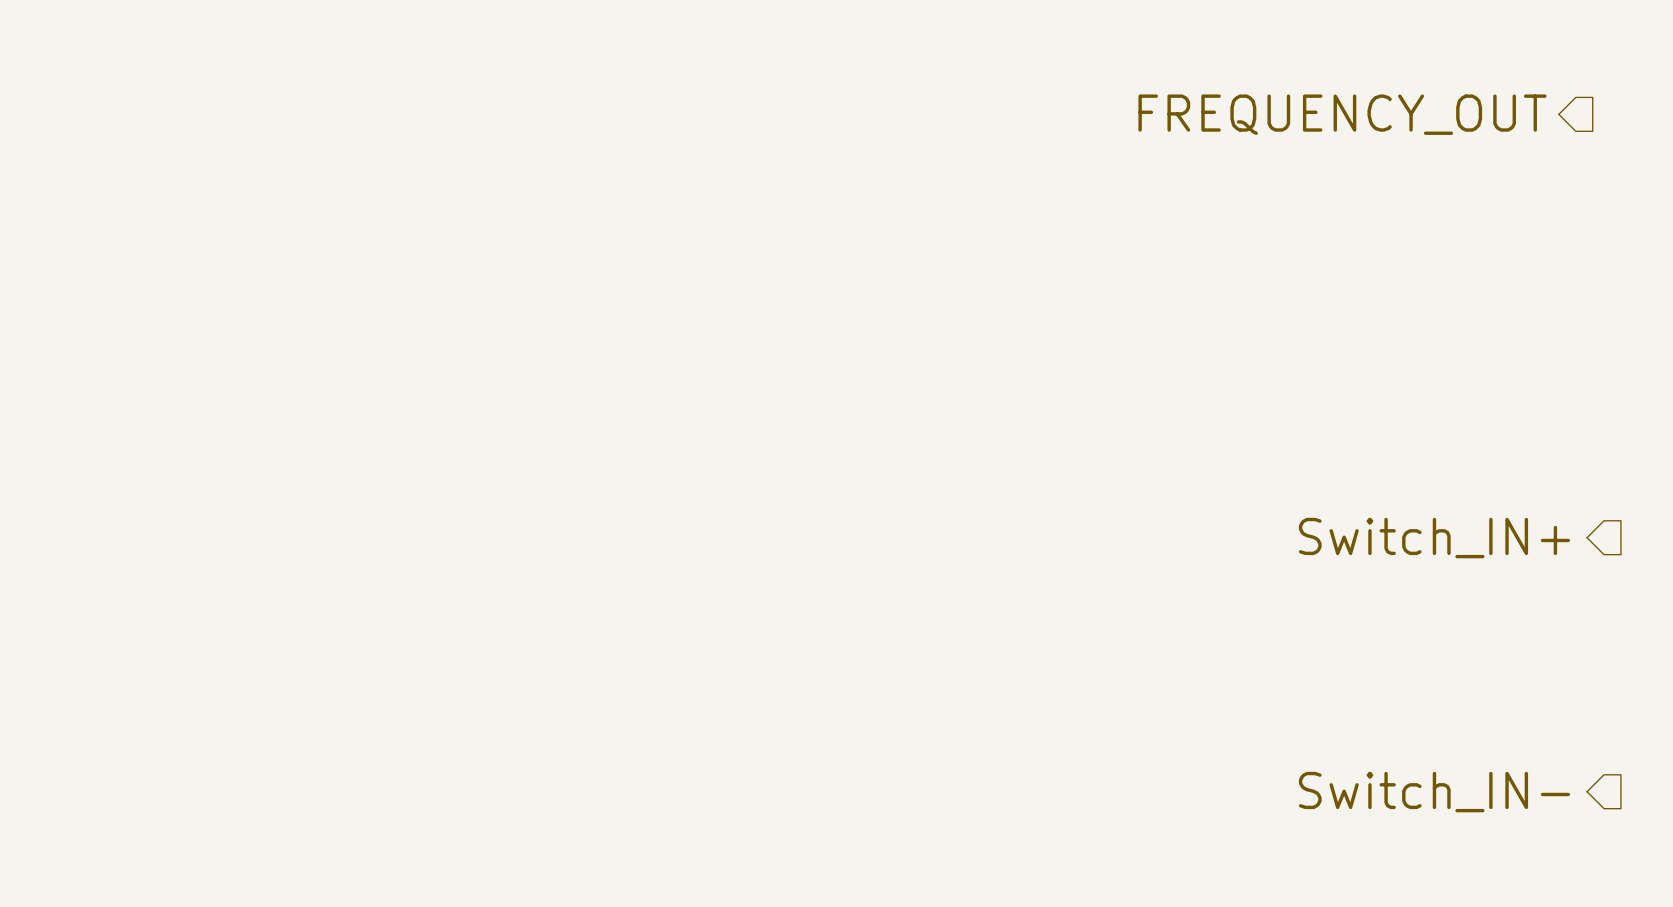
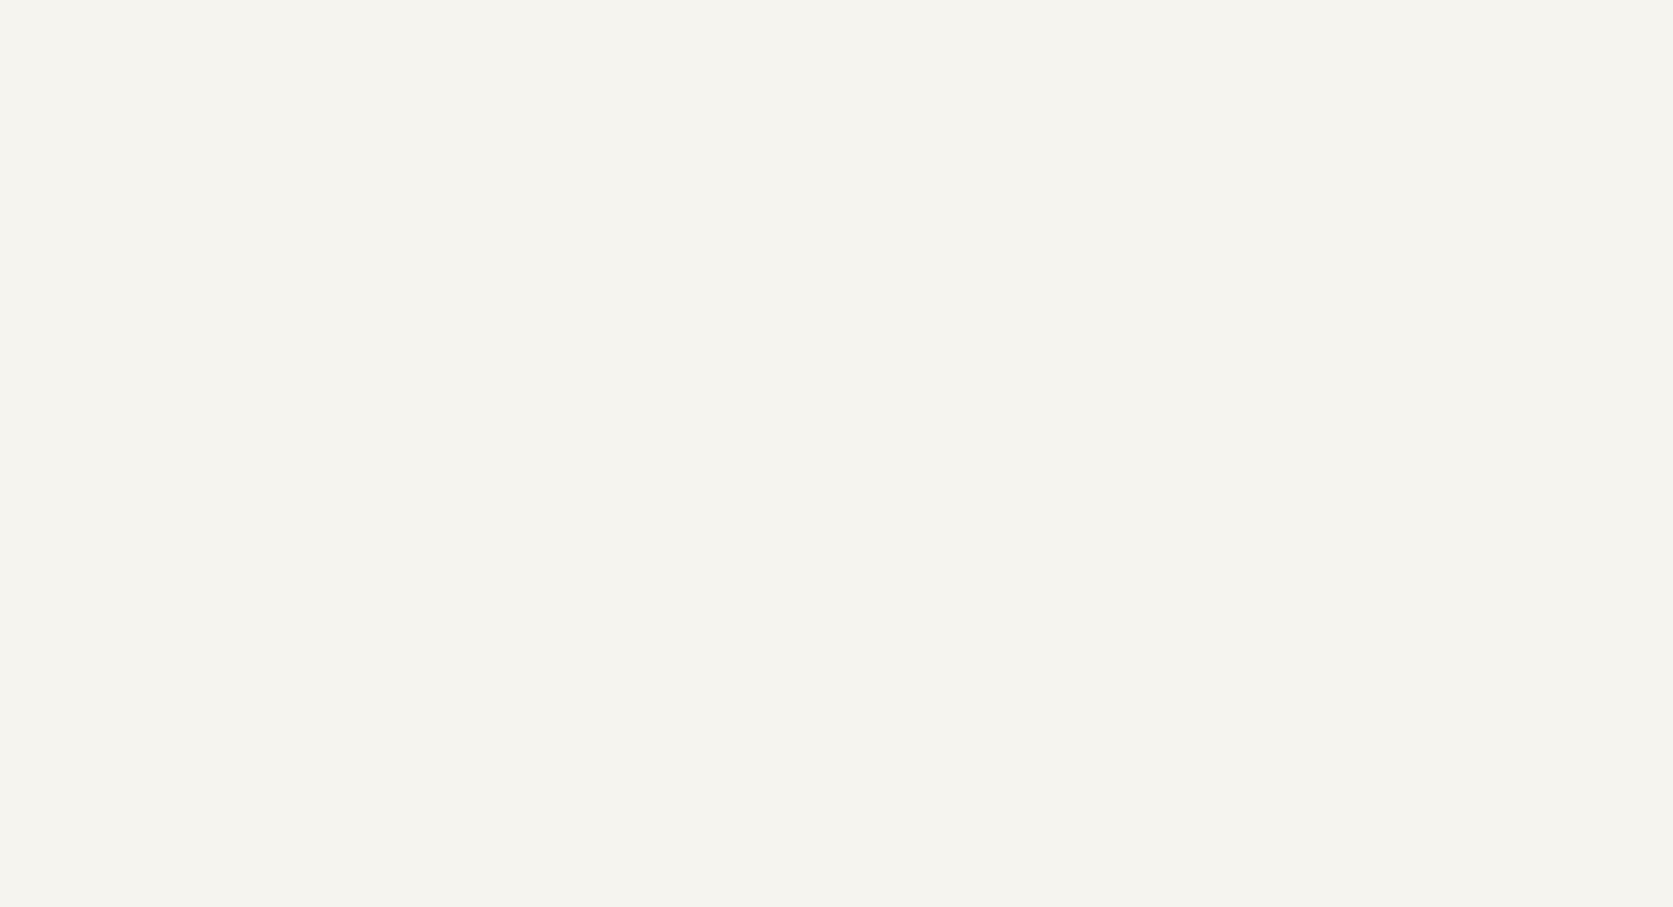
hierarchical label: FREQUENCY_OUT (1342, 114) -> none
hierarchical label: Switch_IN+ (1434, 538) -> none
hierarchical label: Switch_IN- (1434, 792) -> none

